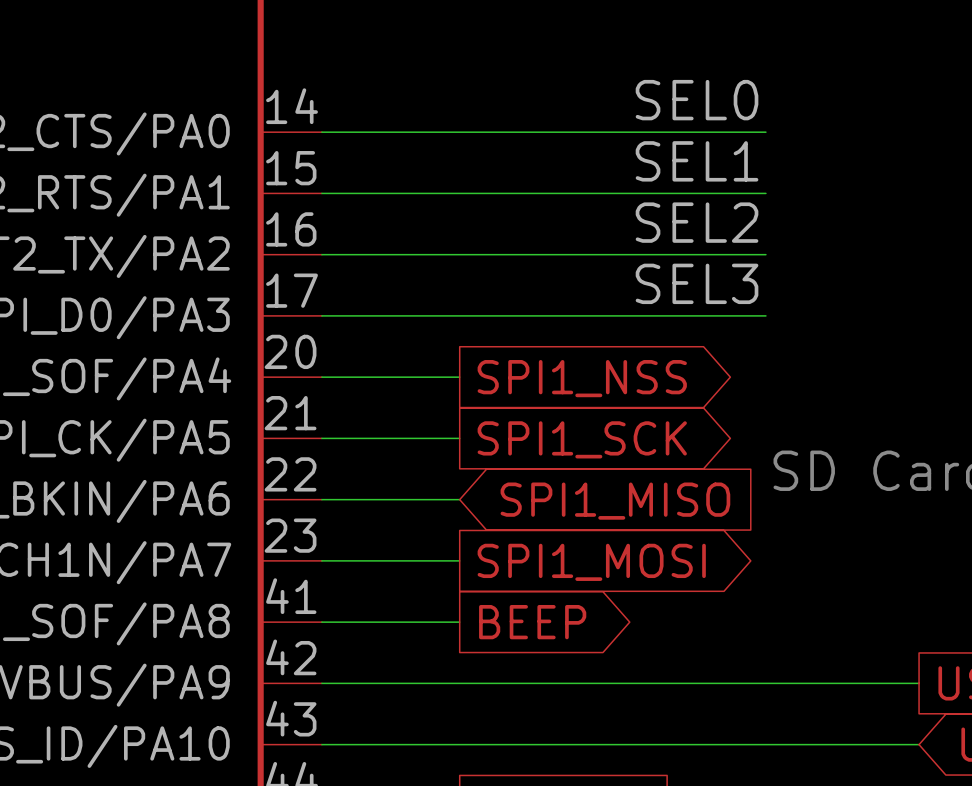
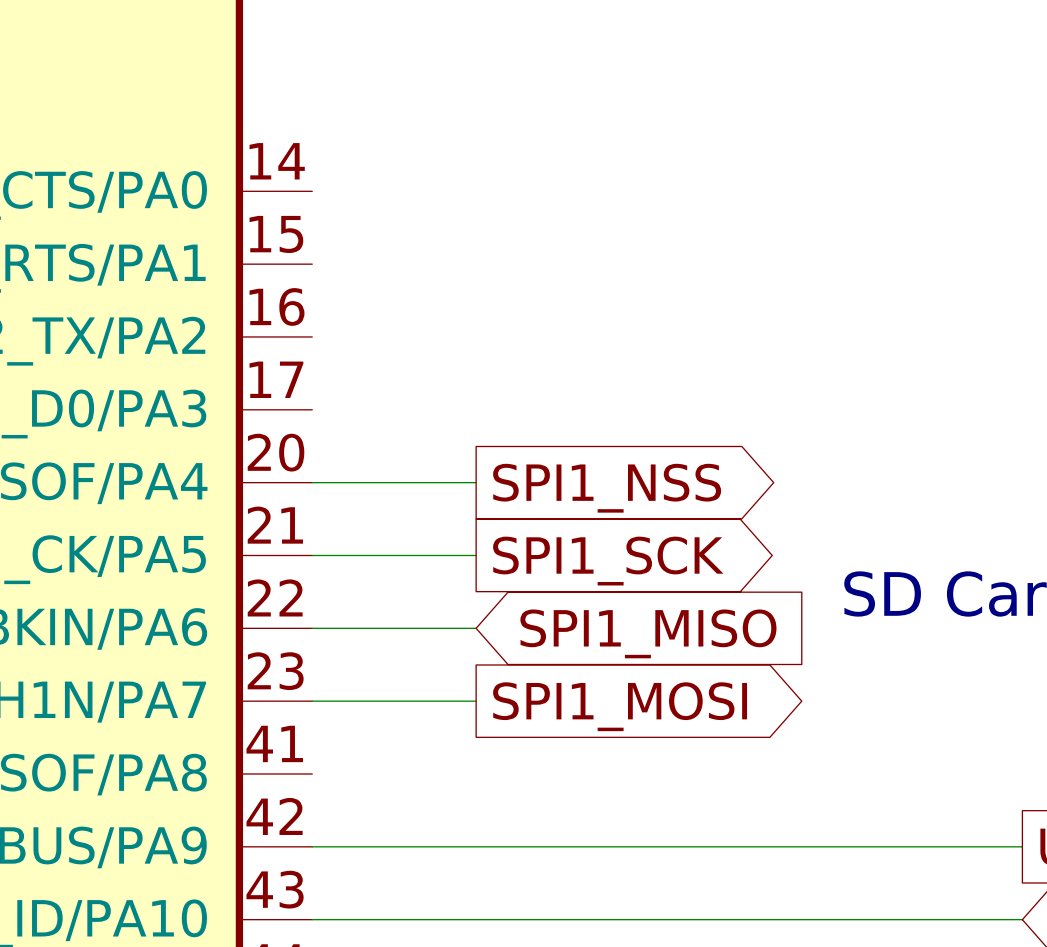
label: SEL0 (697, 100) -> none
wire: (321, 132) (765, 132) -> none
label: SEL1 (697, 161) -> none
wire: (321, 193) (765, 193) -> none
label: SEL2 (697, 222) -> none
wire: (321, 254) (765, 254) -> none
label: SEL3 (697, 283) -> none
wire: (321, 315) (765, 315) -> none
wire: (321, 622) (459, 622) -> none
global label: BEEP (532, 622) -> none

